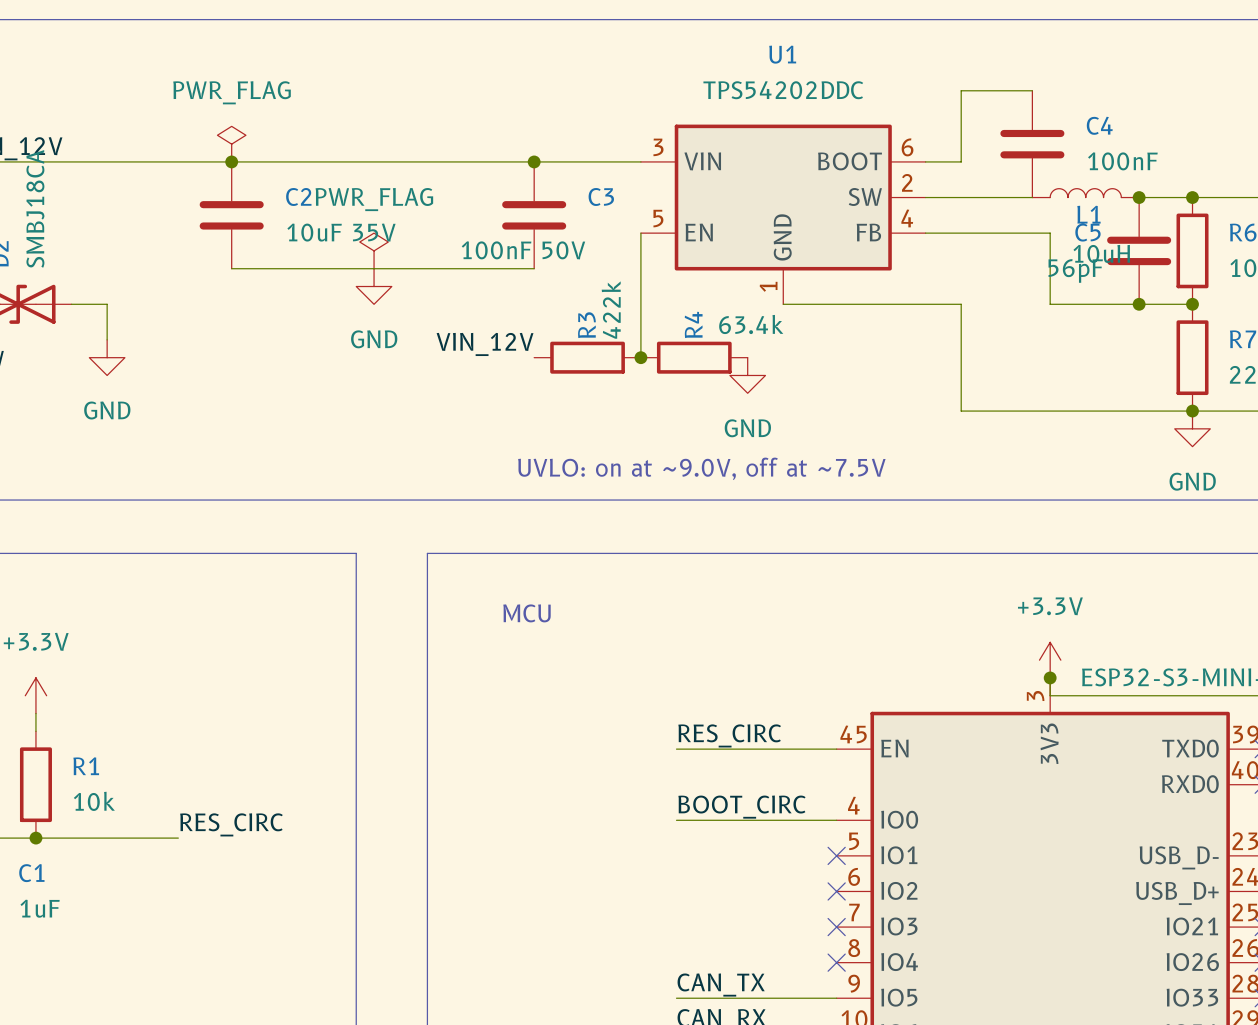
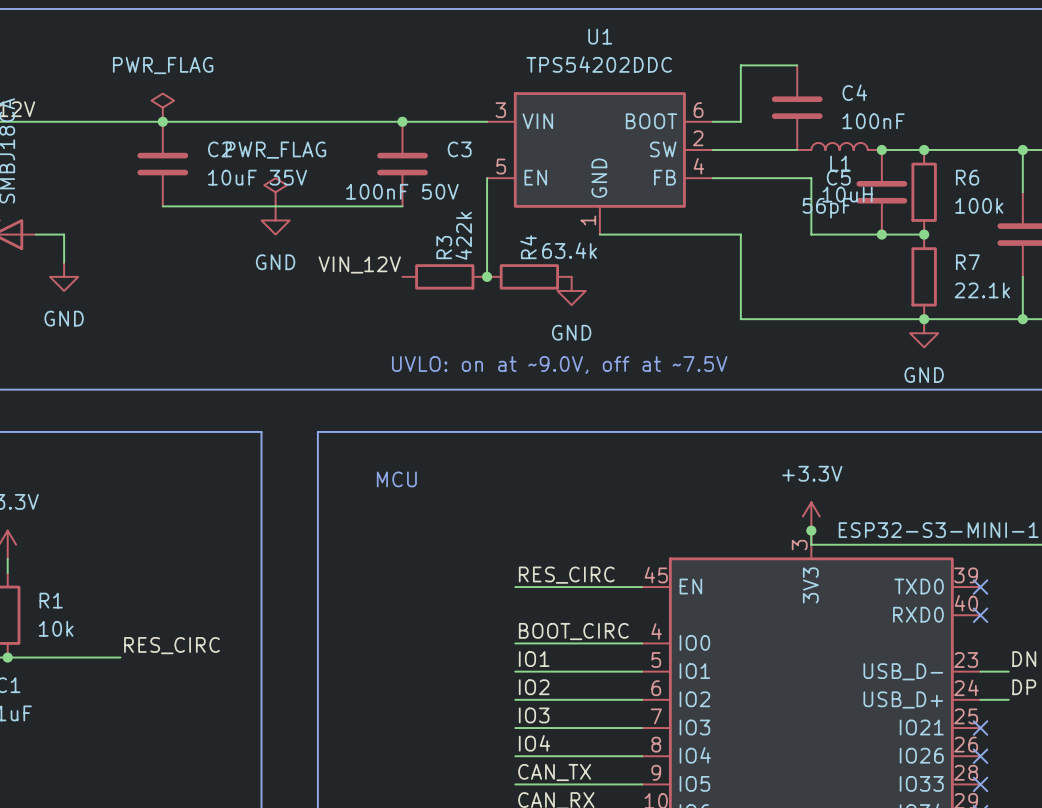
label: none -> IO1 (534, 659)
wire: none -> (515, 671) (642, 671)
no-connect mark: (836, 855) -> none
label: none -> IO2 (534, 687)
wire: none -> (515, 699) (642, 699)
no-connect mark: (836, 891) -> none
label: none -> IO3 (534, 715)
wire: none -> (515, 728) (642, 728)
no-connect mark: (836, 927) -> none
label: none -> IO4 (534, 743)
wire: none -> (515, 756) (642, 756)
no-connect mark: (836, 962) -> none

